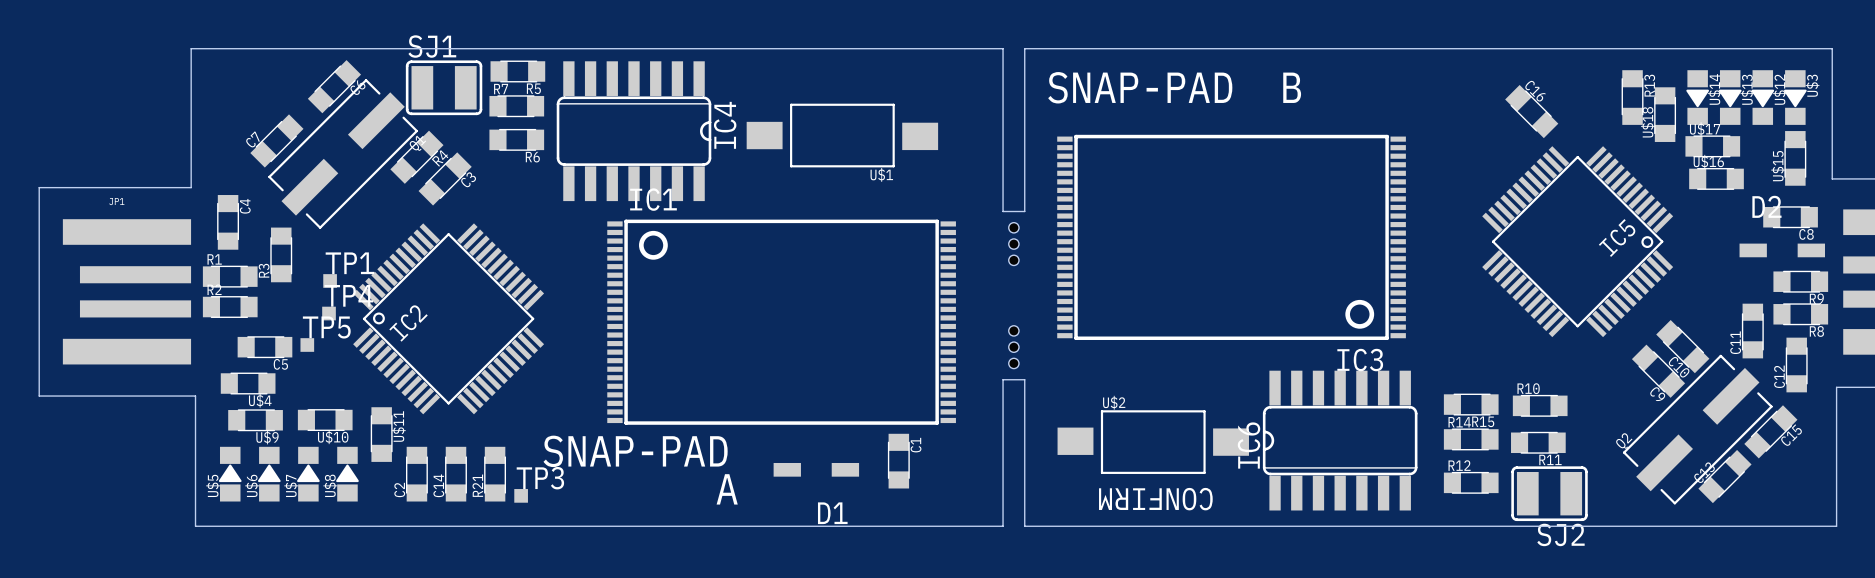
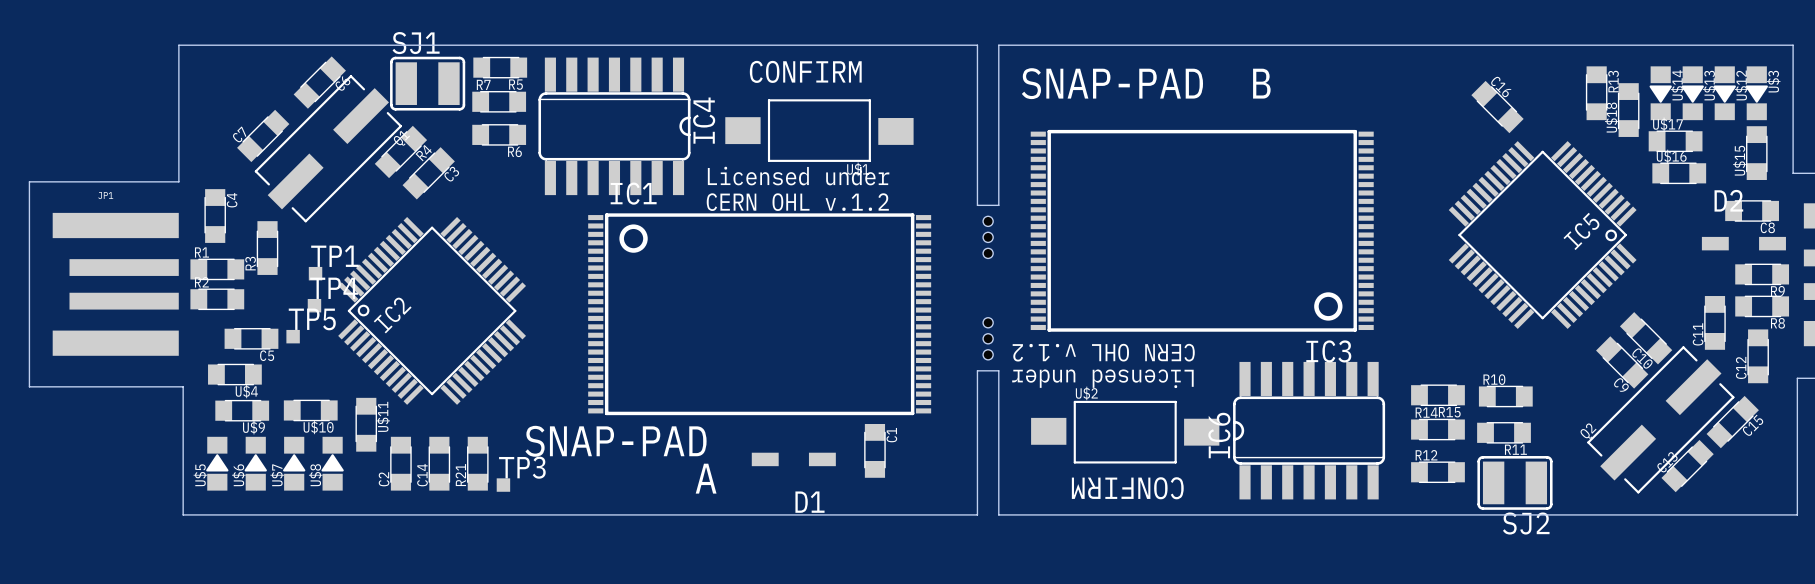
text: none -> CONFIRM (805, 71)
text: none -> Licensed under (798, 176)
text: none -> CERN OHL v.1.2 (797, 202)
text: none -> CERN OHL v.1.2 (1103, 352)
text: none -> Licensed under (1102, 378)

